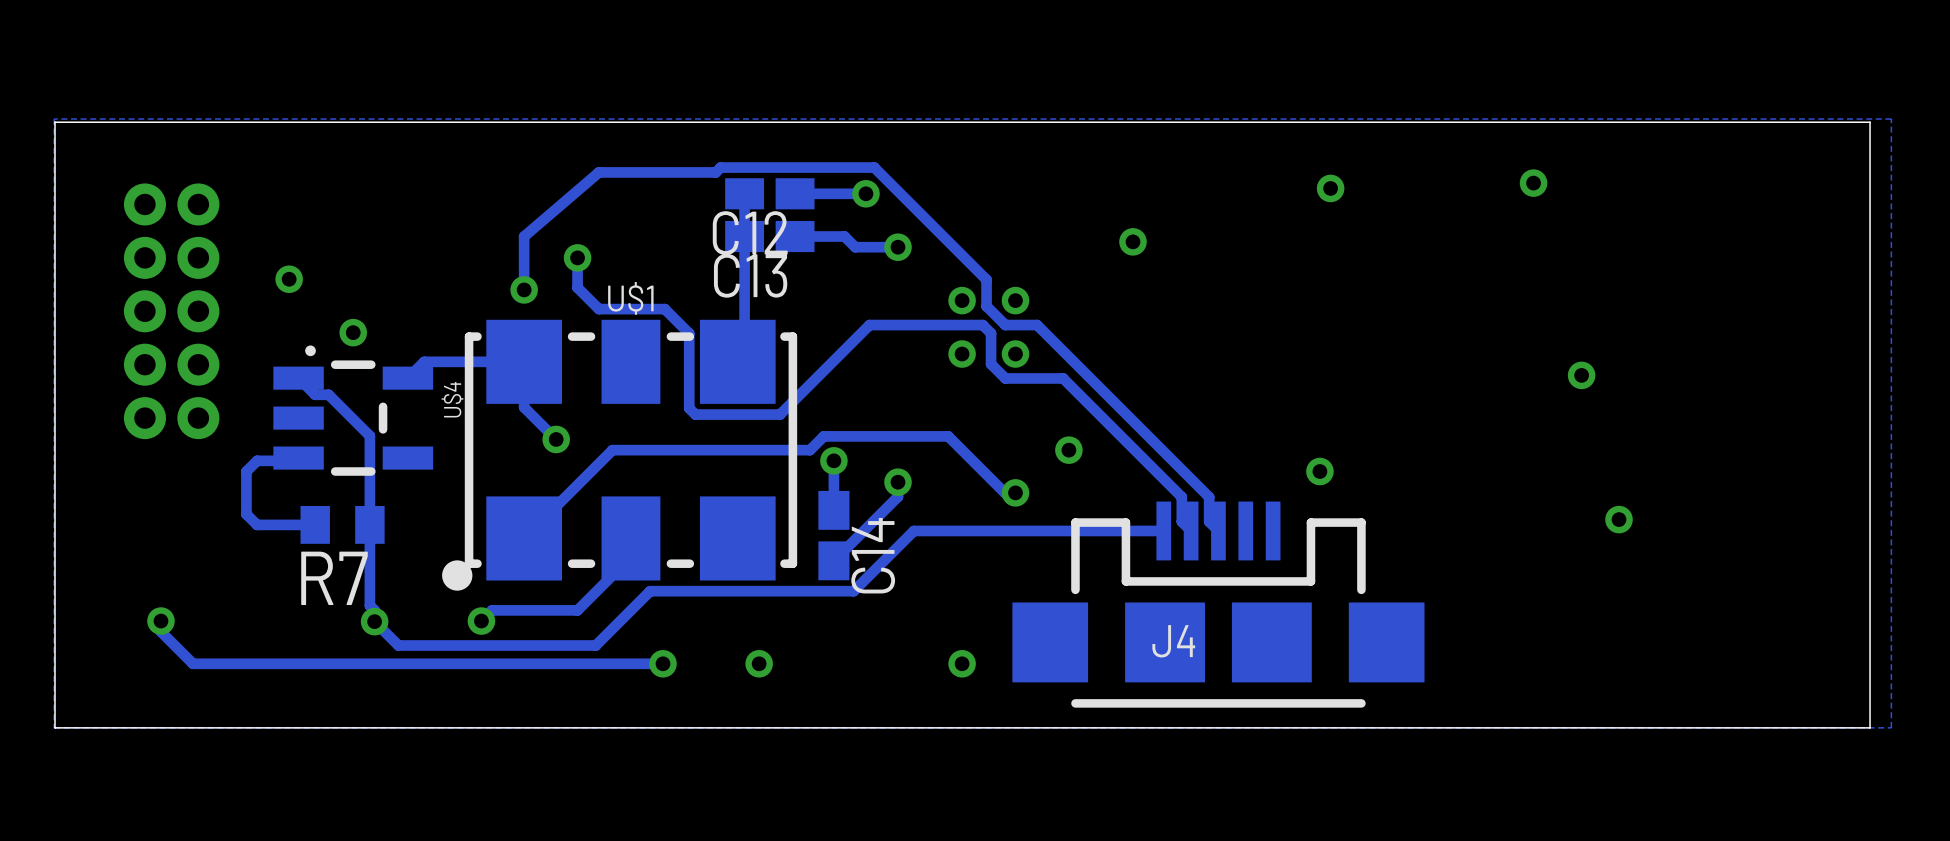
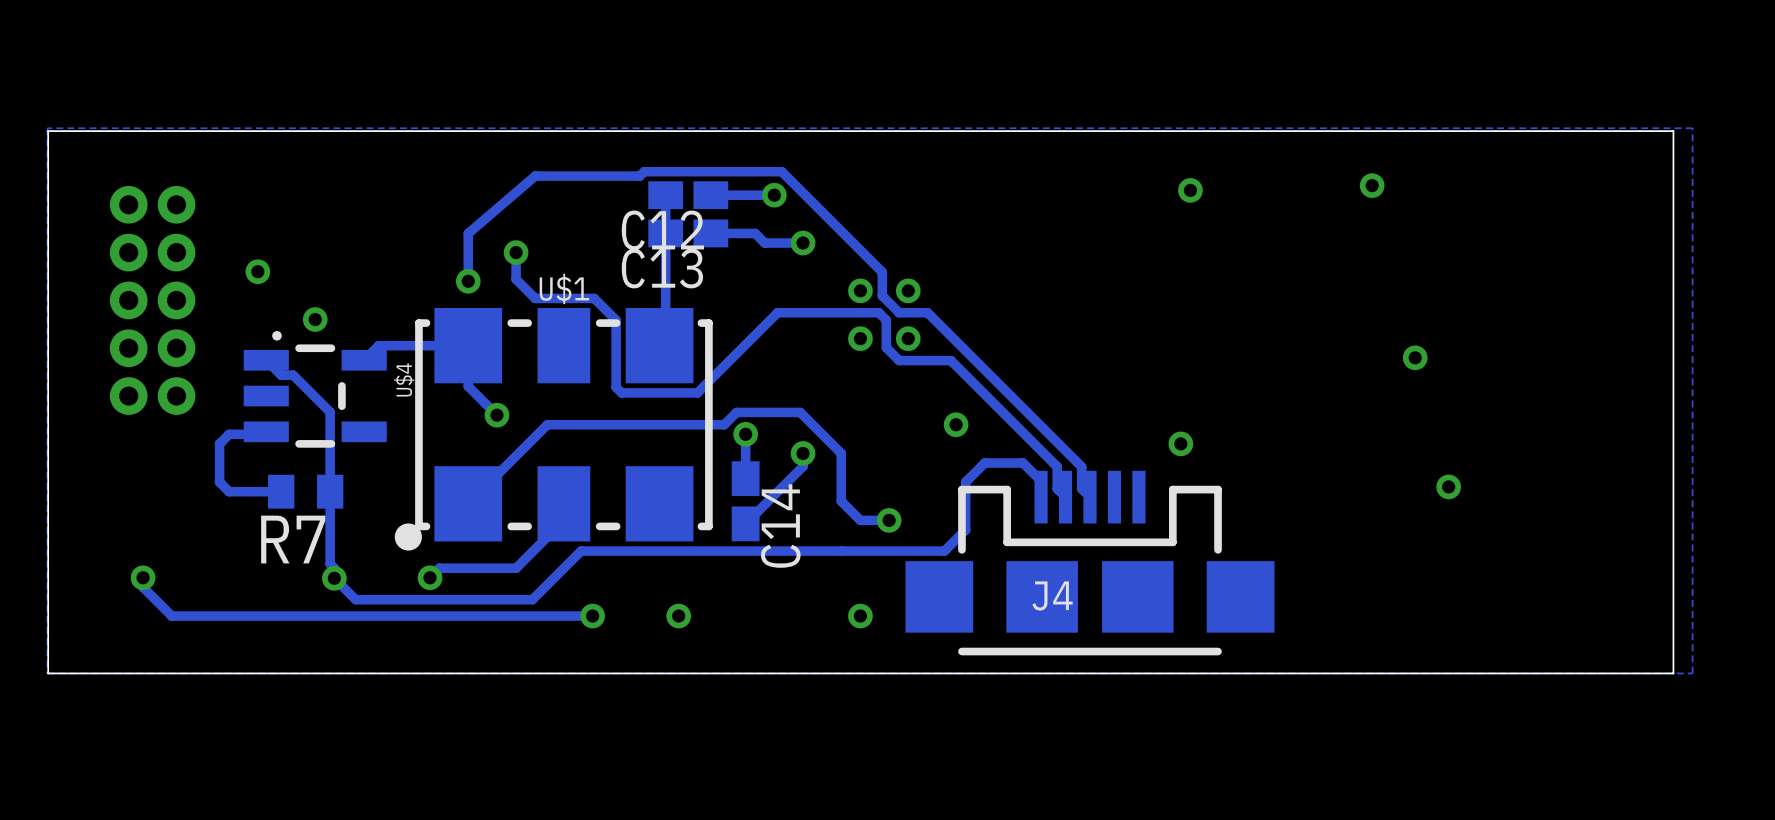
via: (1133, 241) -> none
track: (894, 436) (948, 436) (1004, 492) (1015, 492) -> (800, 412) (841, 453) (841, 501) (860, 520) (889, 520)
via position: (1015, 492) -> (889, 520)
track: (1163, 530) (913, 530) (853, 591) -> (1041, 497) (1041, 481) (1023, 463) (984, 463) (965, 482) (965, 529) (944, 551) (763, 551)

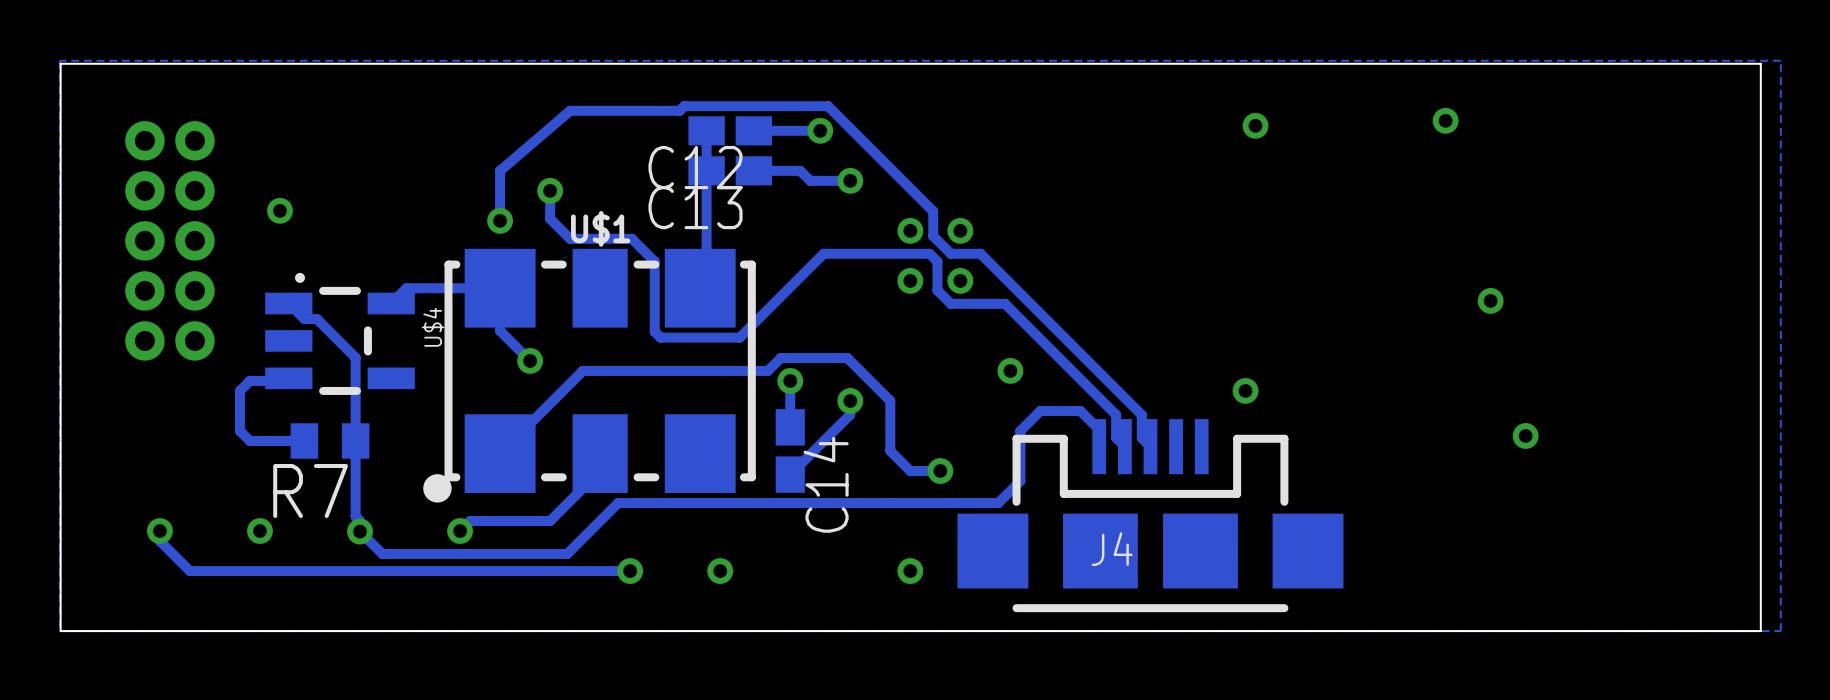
via: (315, 319) -> none
via: none -> (259, 531)

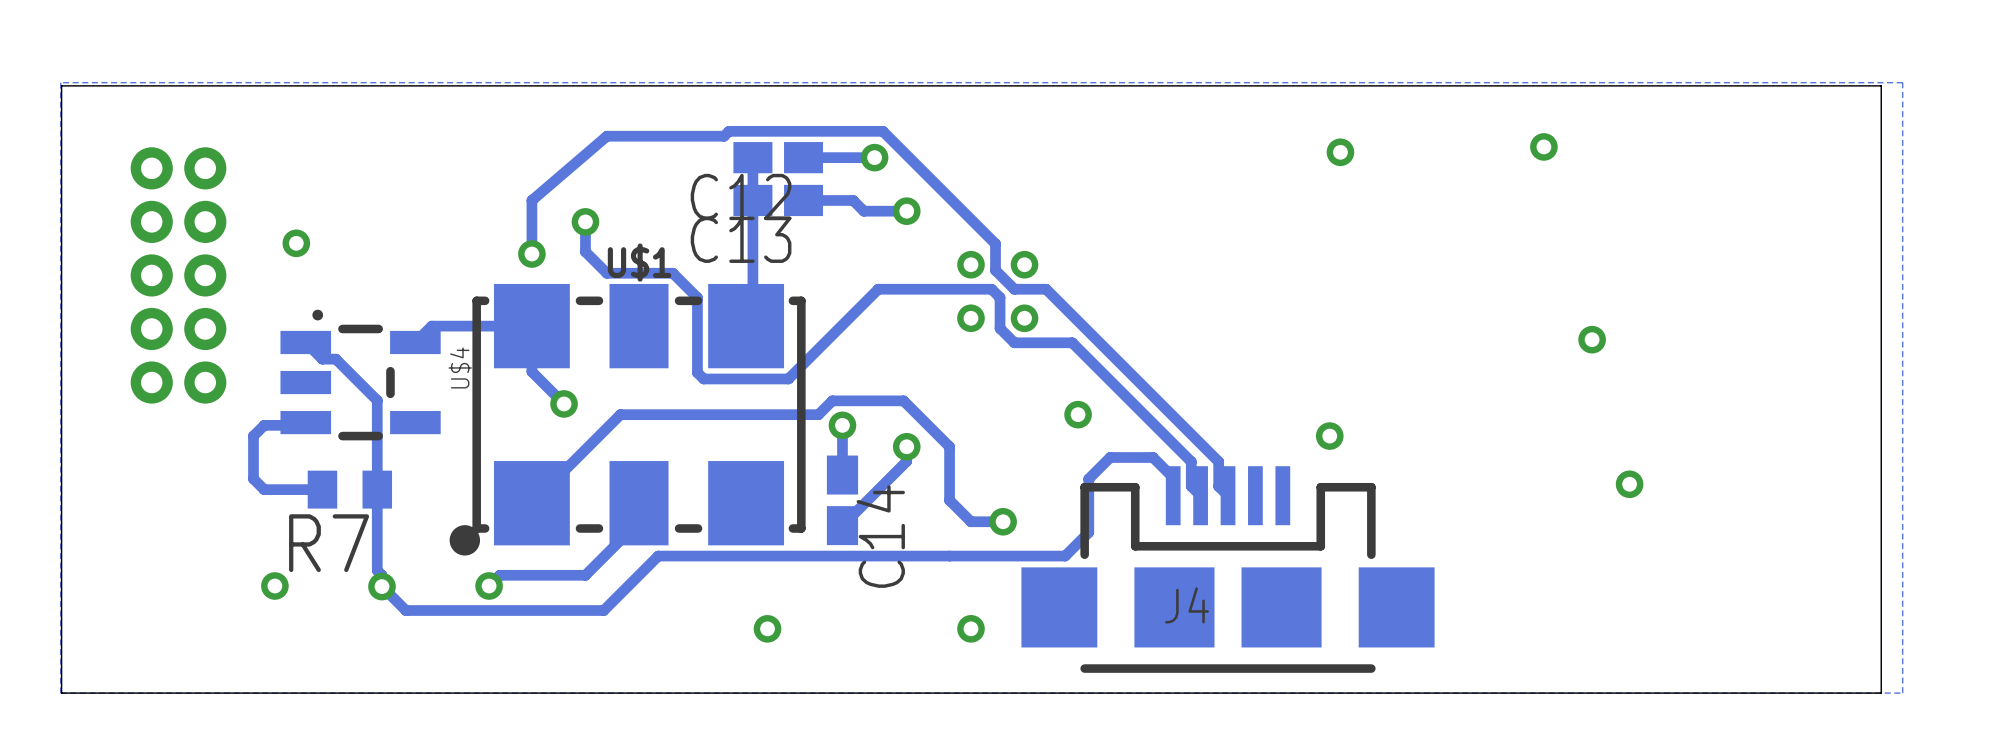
track: (159, 531) (159, 541) (189, 571) (630, 571) -> none
via: (159, 531) -> none
via: (630, 571) -> none

